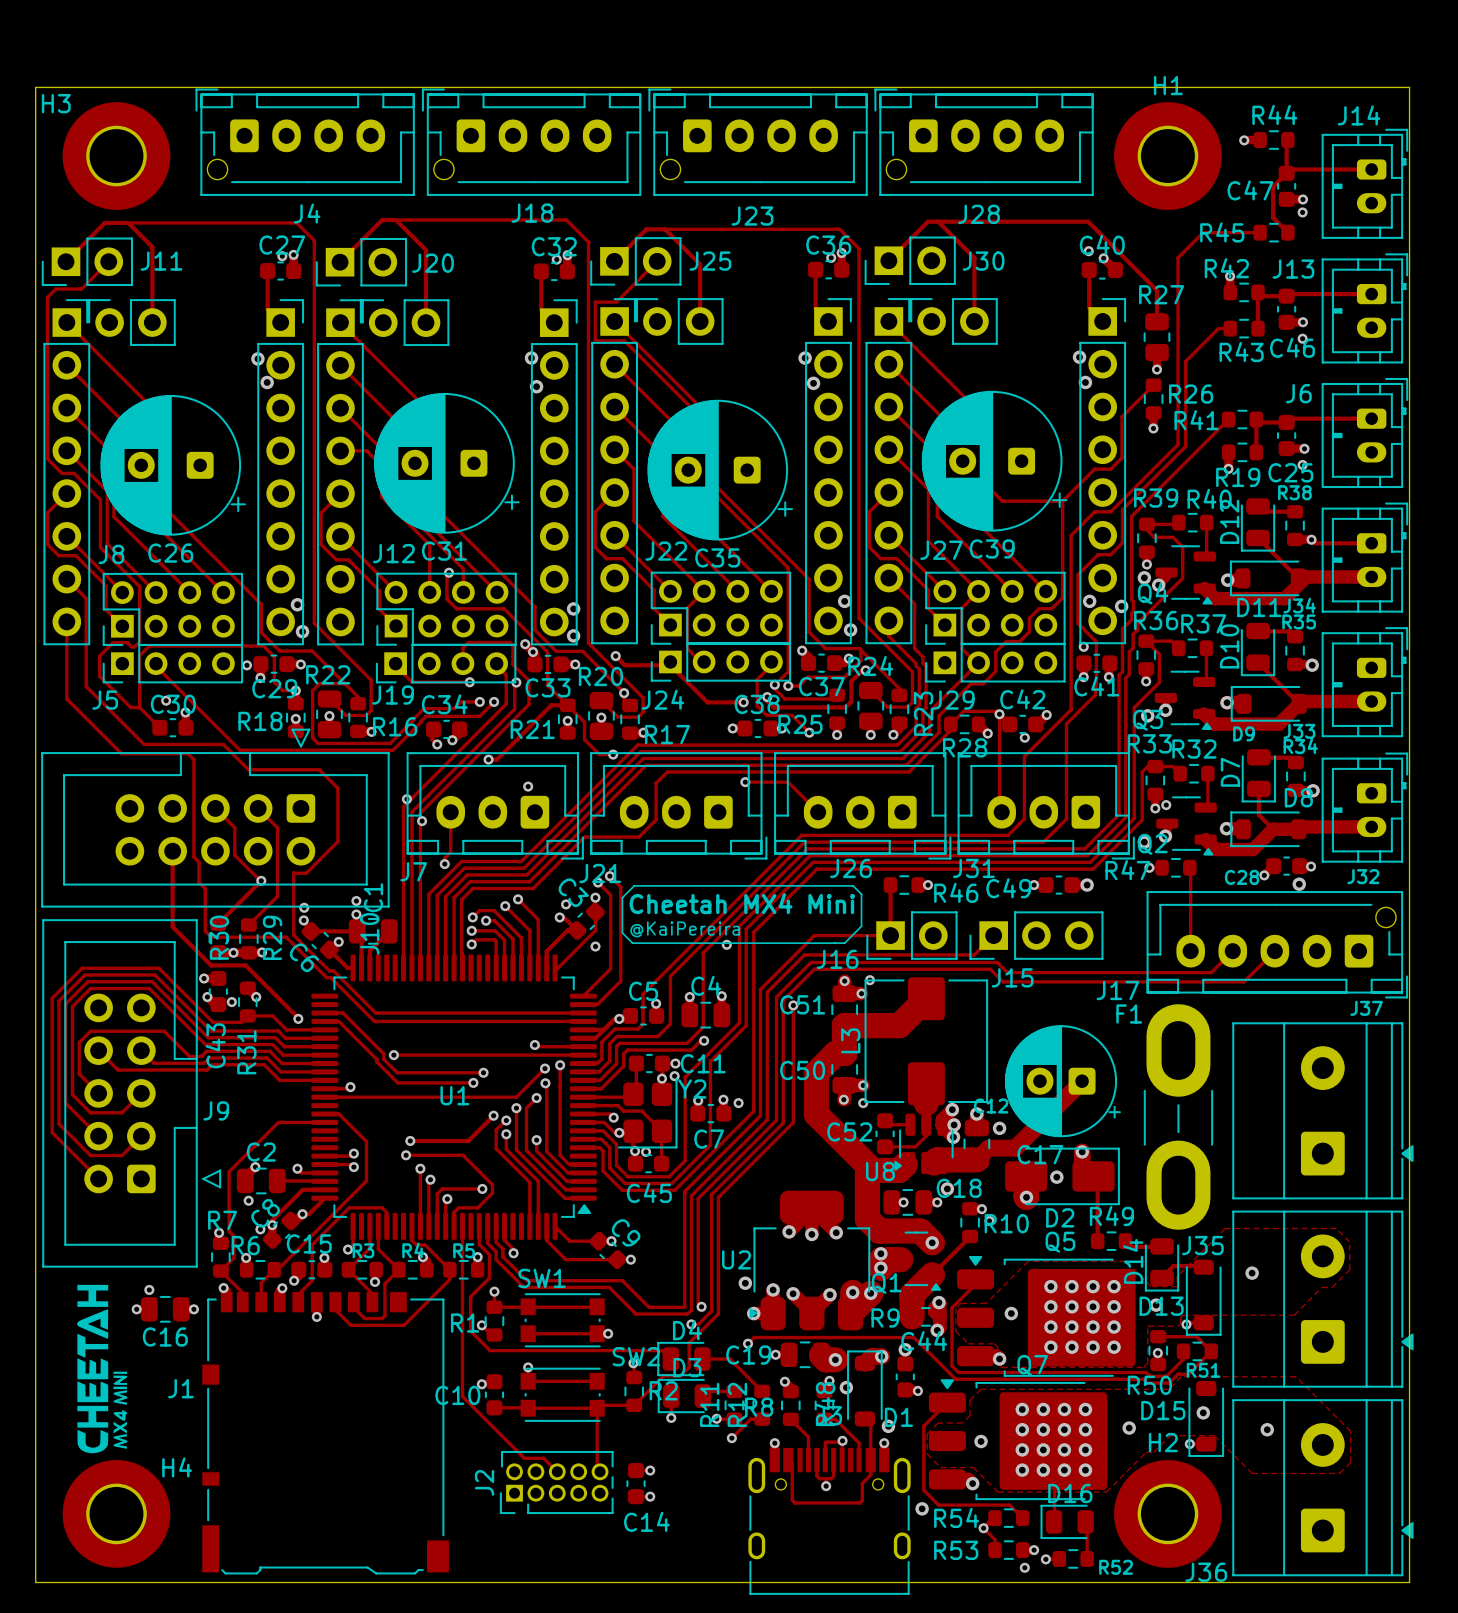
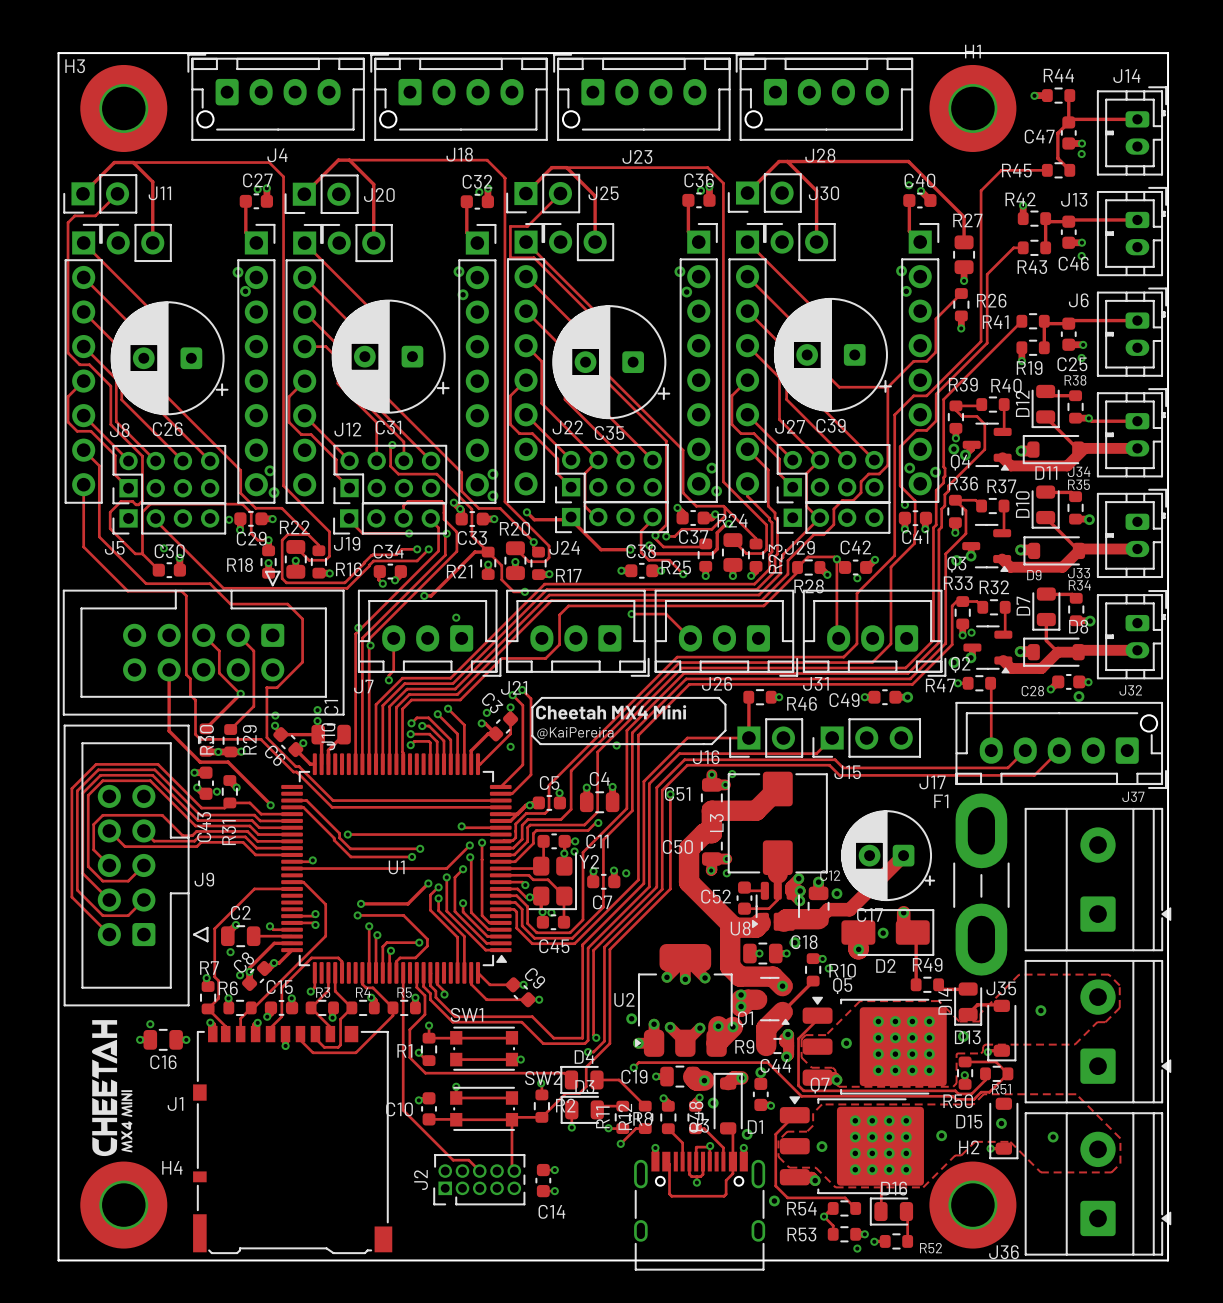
Q5 name position: Q5 (1060, 1242) -> Q5 (842, 986)
Q7 name position: Q7 (1032, 1365) -> Q7 (820, 1085)

